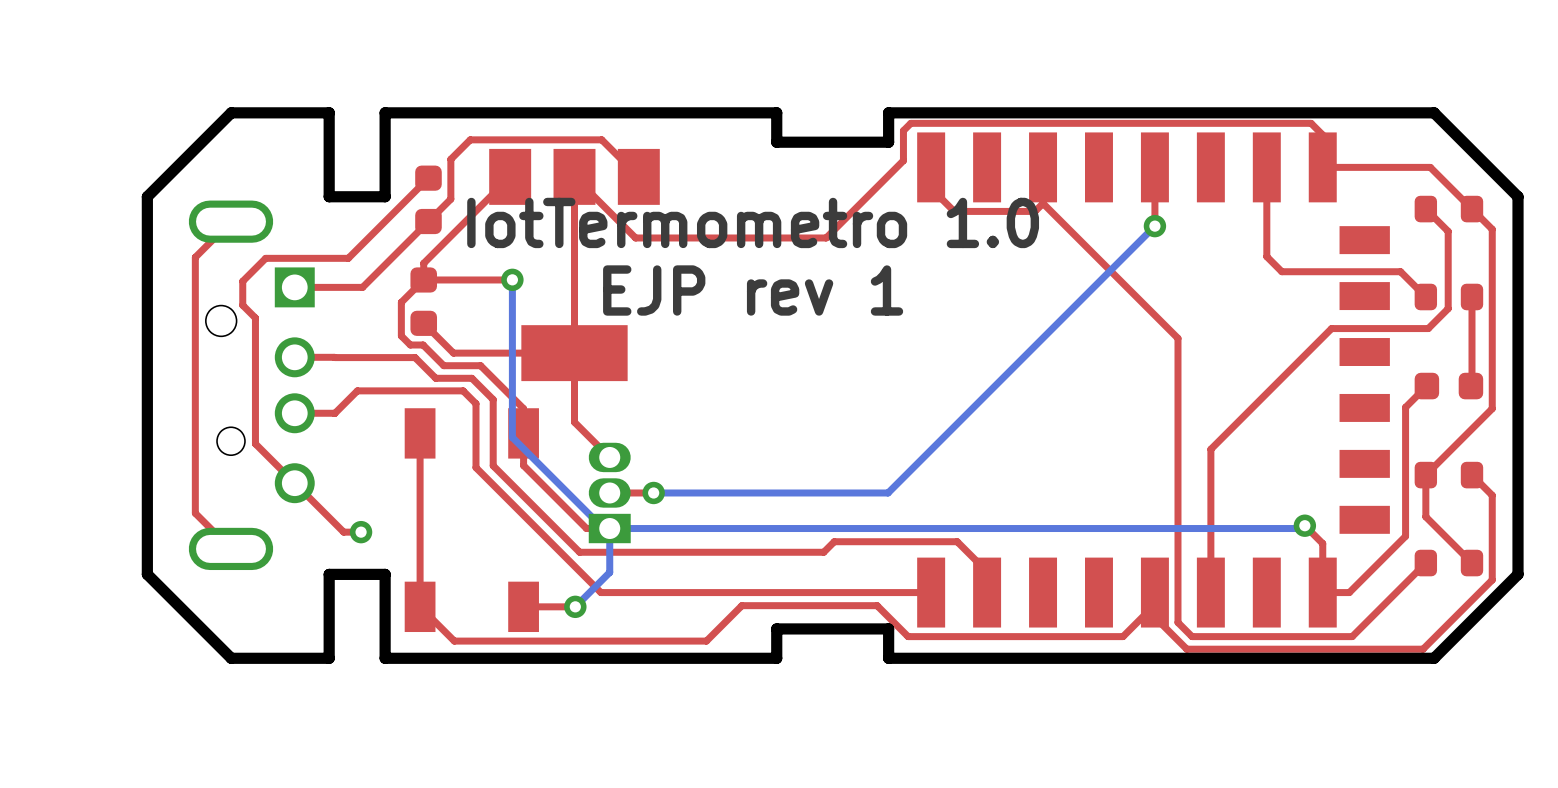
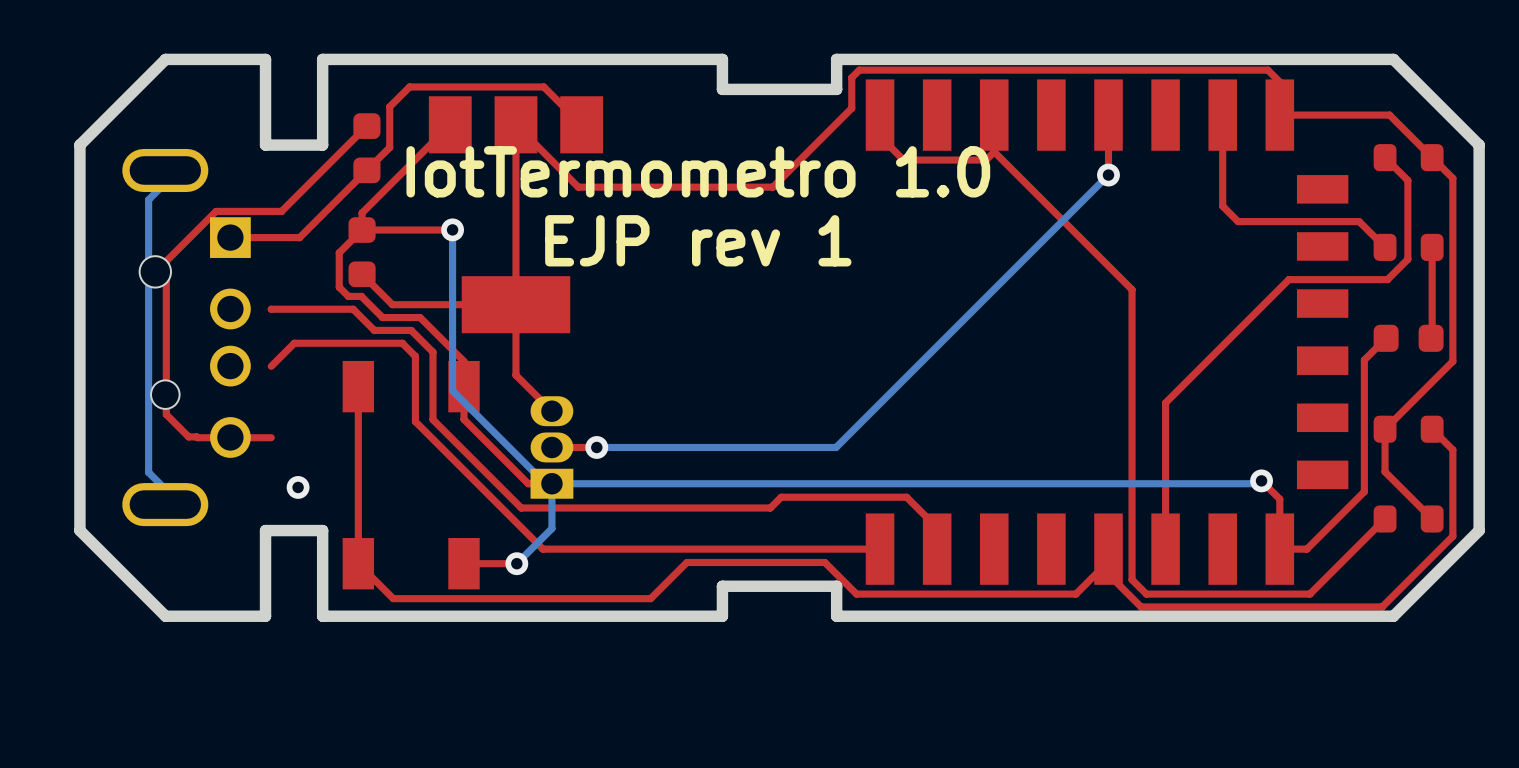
top track: (230, 221) (195, 257) (195, 513) (230, 548) -> none
bottom track: none -> (175, 173) (148, 199) (148, 472) (175, 498)
top track: (348, 258) (265, 258) (242, 281) (242, 305) (255, 318) (255, 443) (343, 532) (361, 532) -> (285, 207) (281, 211) (216, 211) (166, 261) (166, 414) (188, 436) (271, 437)
top track: (334, 357) (294, 357) -> none
top track: (334, 413) (294, 413) -> none

